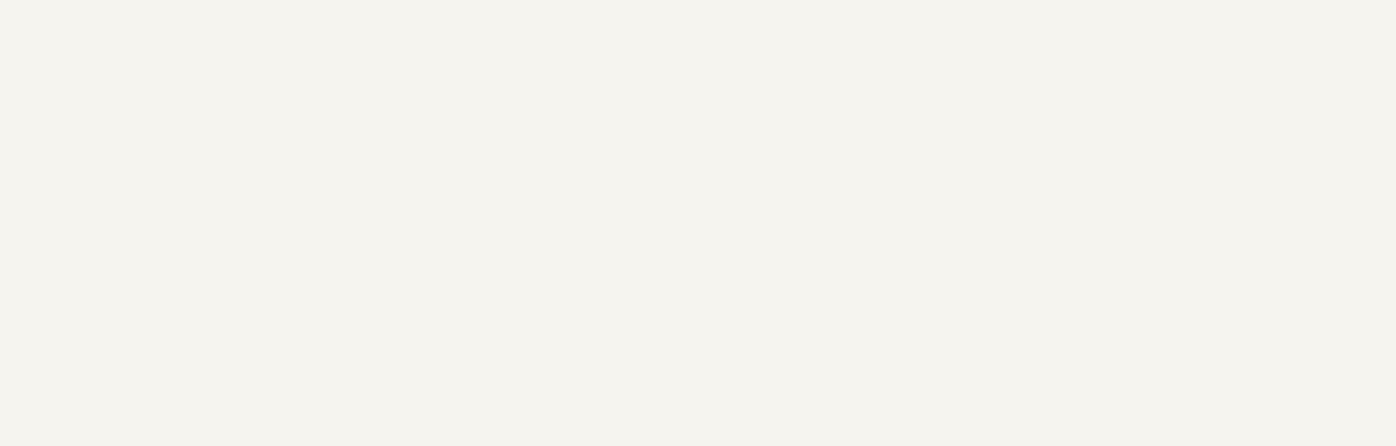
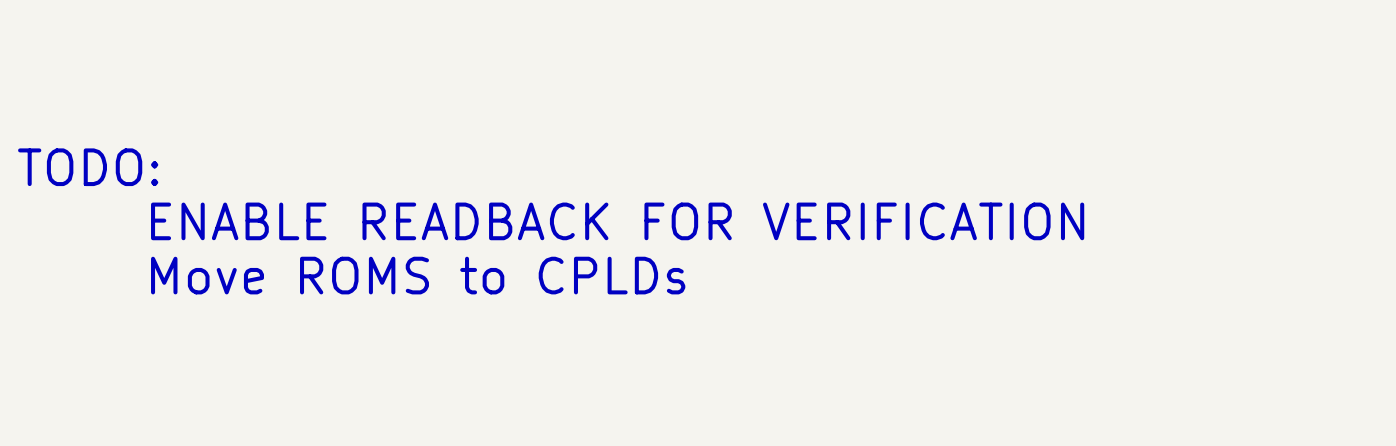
text: none -> TODO: (88, 167)
text: none -> ENABLE READBACK FOR VERIFICATION (617, 221)
text: none -> Move ROMS to CPLDs (418, 275)

